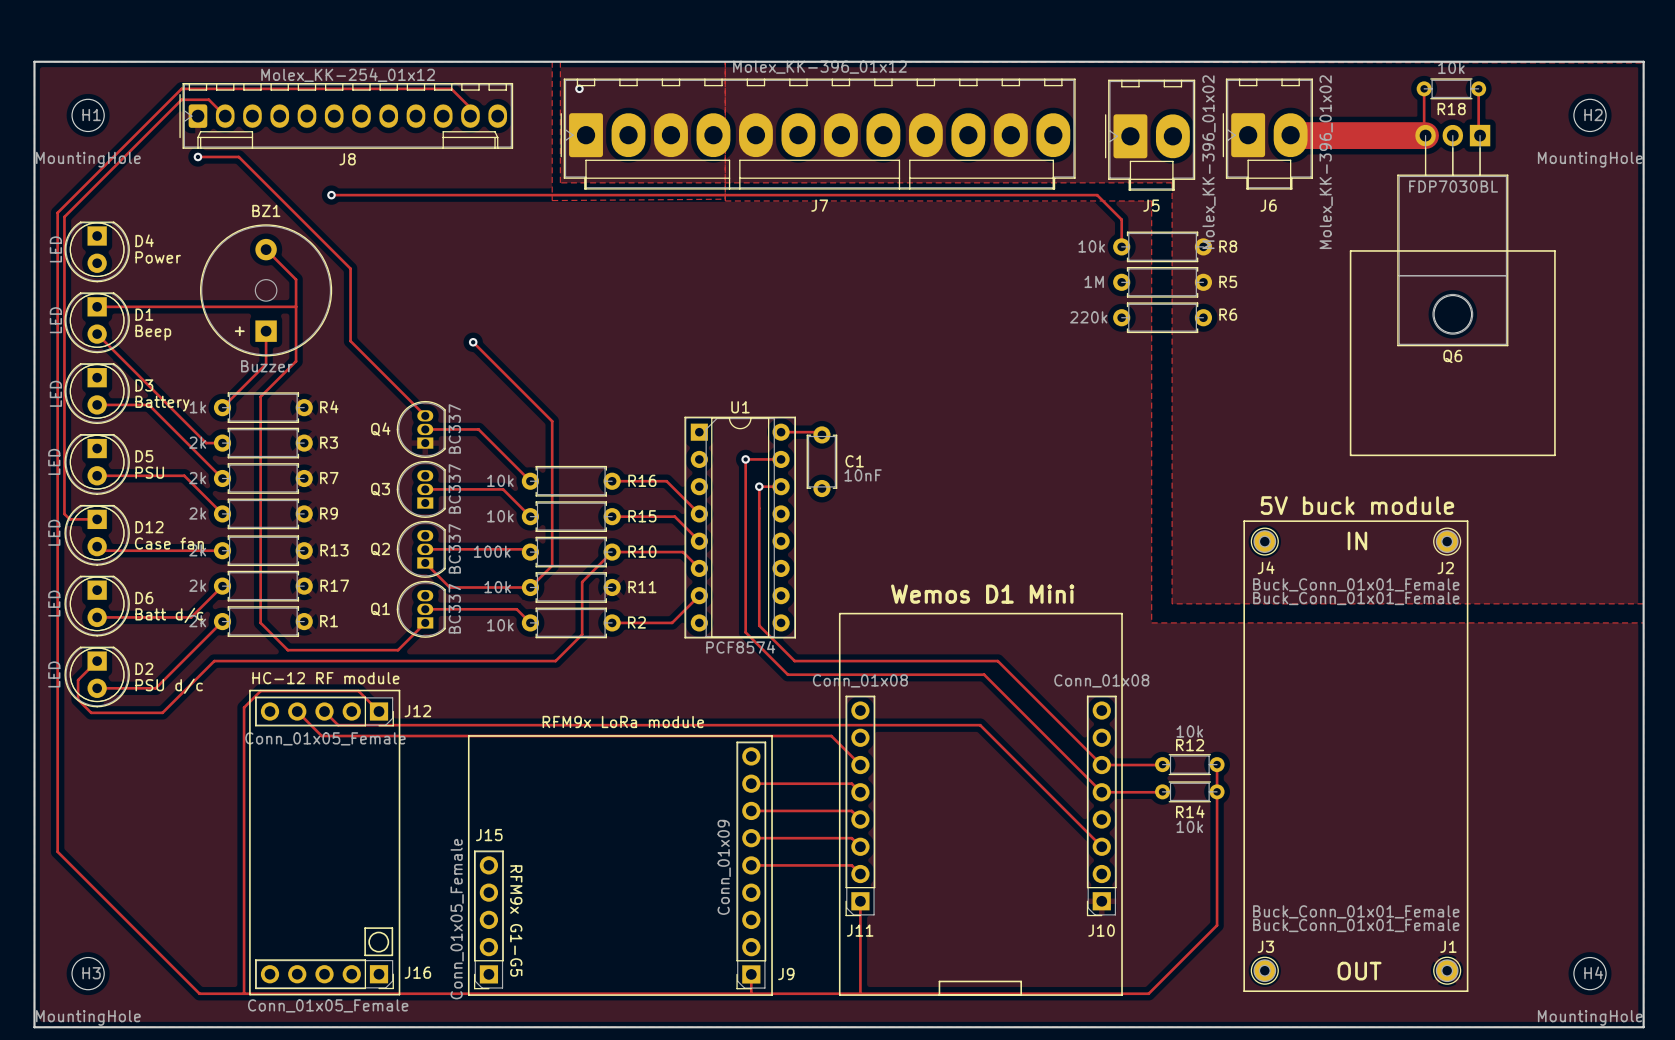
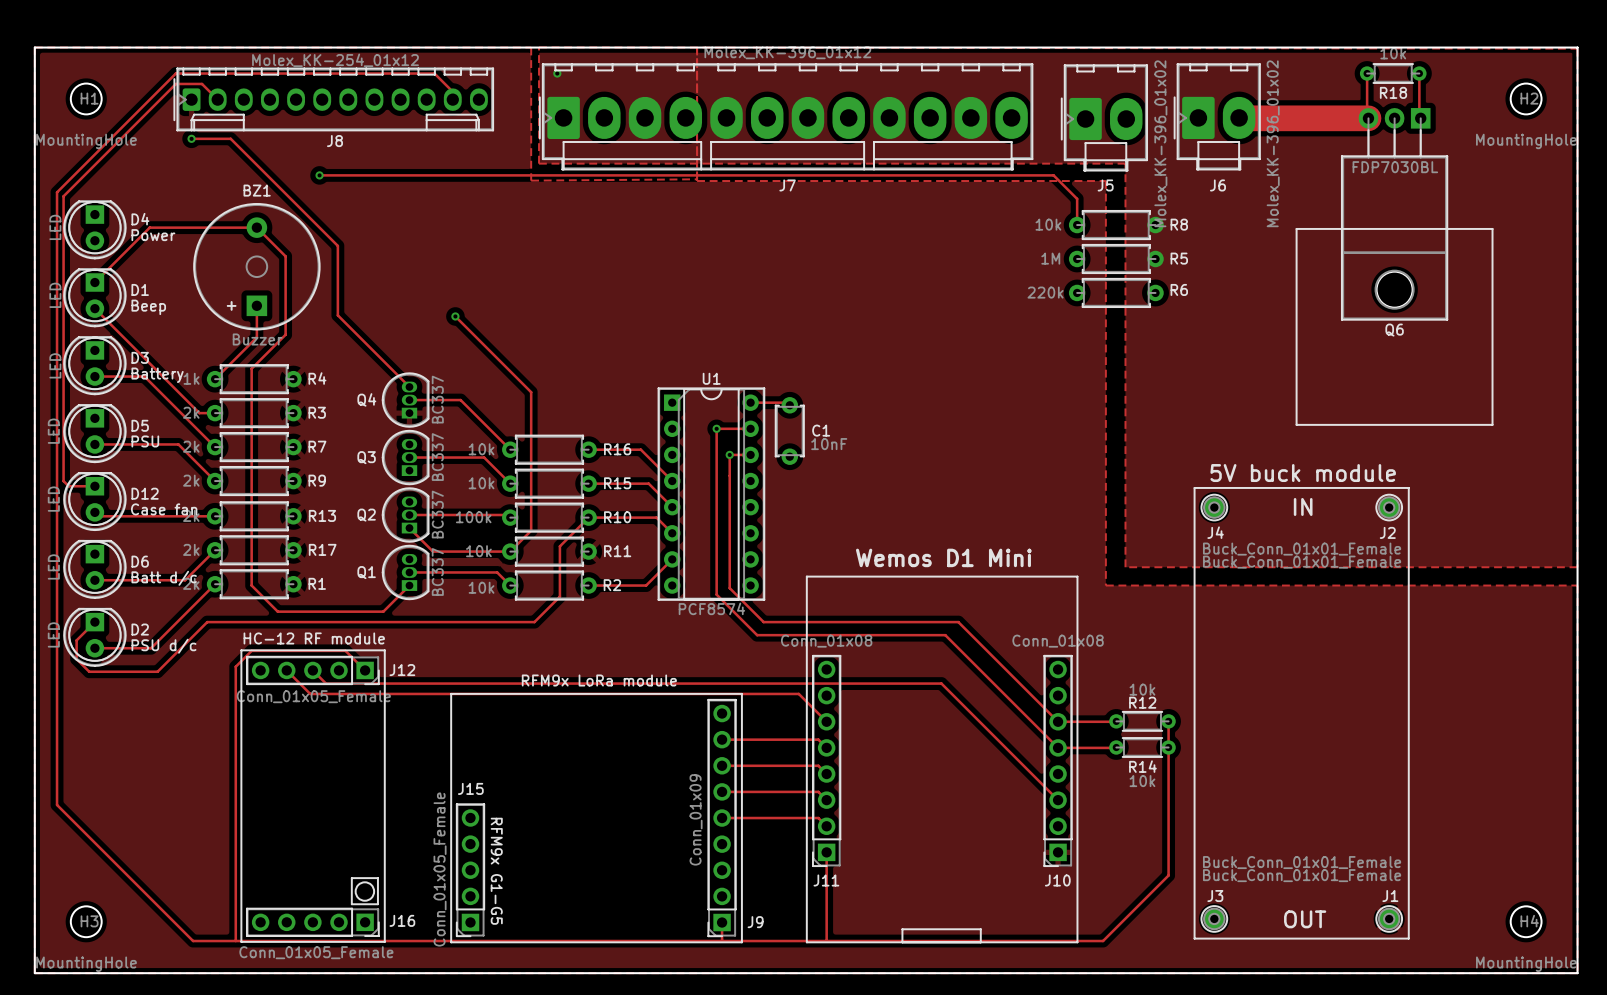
track: (97, 306) (296, 306) -> (94, 282) (149, 227) (256, 227)

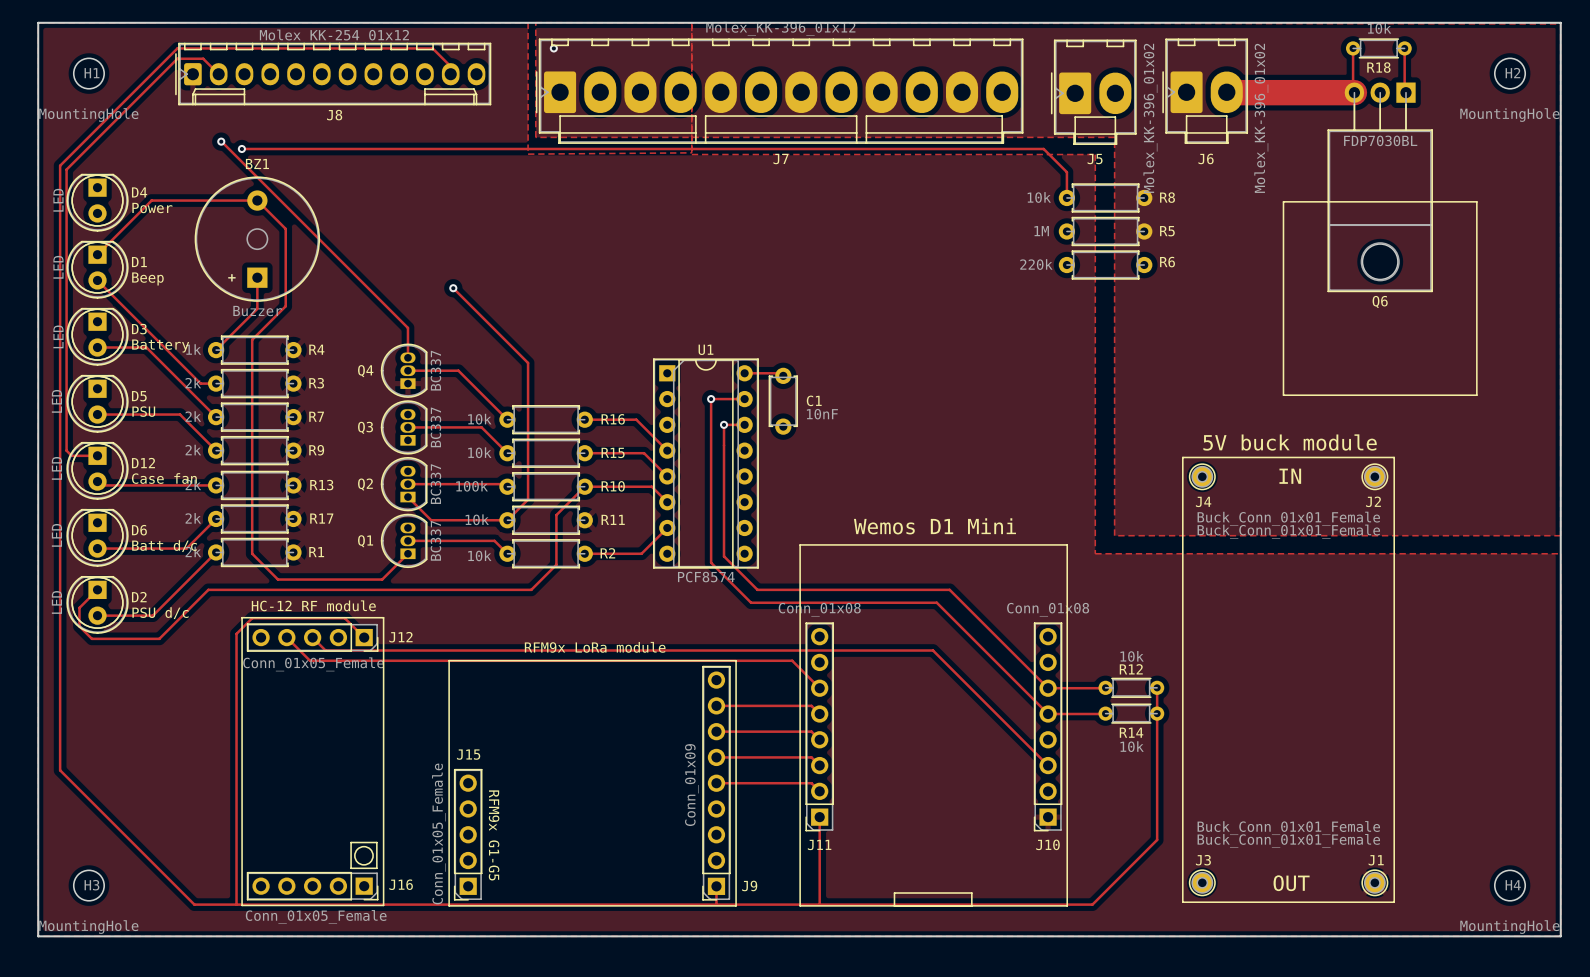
track: (191, 138) (230, 138) (337, 245) (337, 315) (409, 387) -> (221, 141) (407, 327) (407, 357)
via: (191, 138) -> none
via: none -> (221, 141)
track: none -> (241, 148) (319, 148)
via: none -> (241, 148)
via: (319, 175) -> none

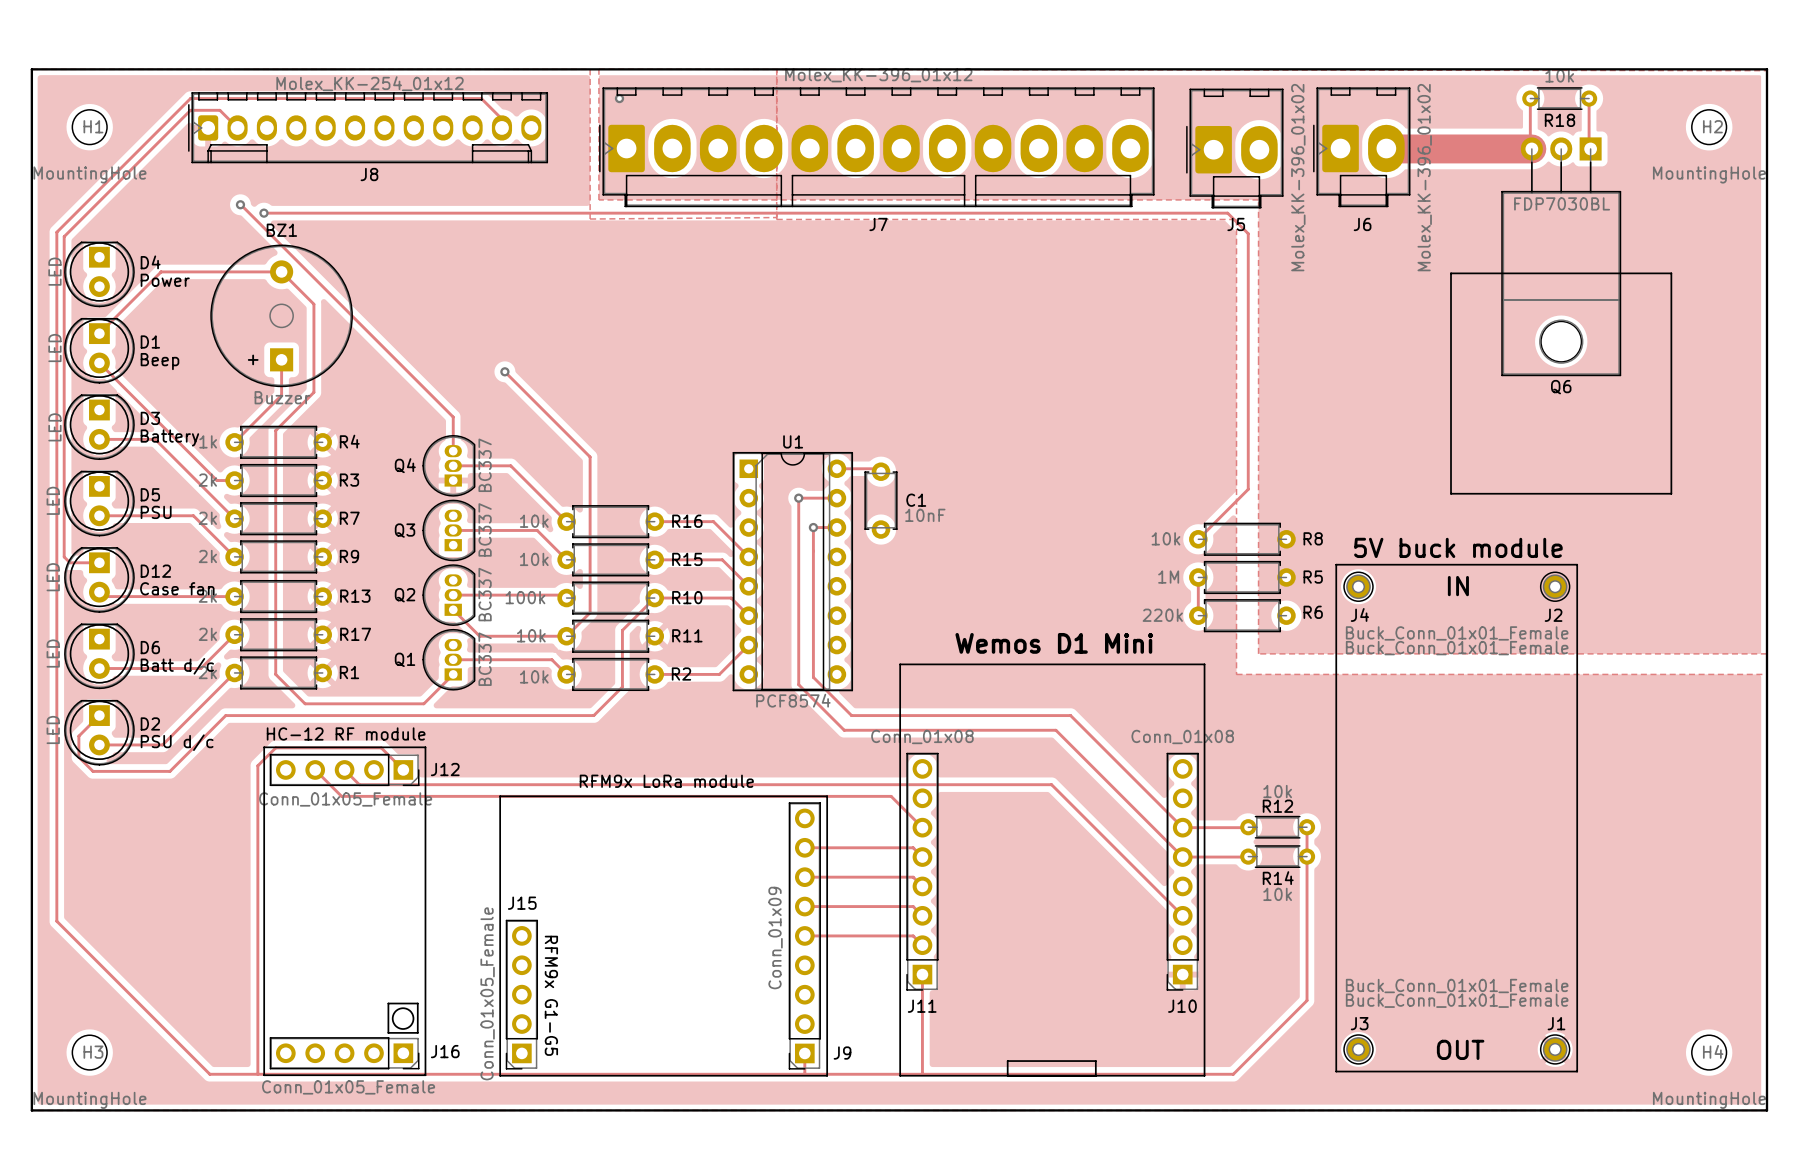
track: (1043, 148) (1066, 172) (1066, 197) -> (1177, 213) (1227, 213) (1248, 233) (1248, 489) (1198, 539)
R8 position: (1105, 197) -> (1242, 539)
R5 position: (1105, 231) -> (1242, 577)
R6 position: (1105, 265) -> (1242, 615)
track: none -> (1198, 577) (1198, 615)

